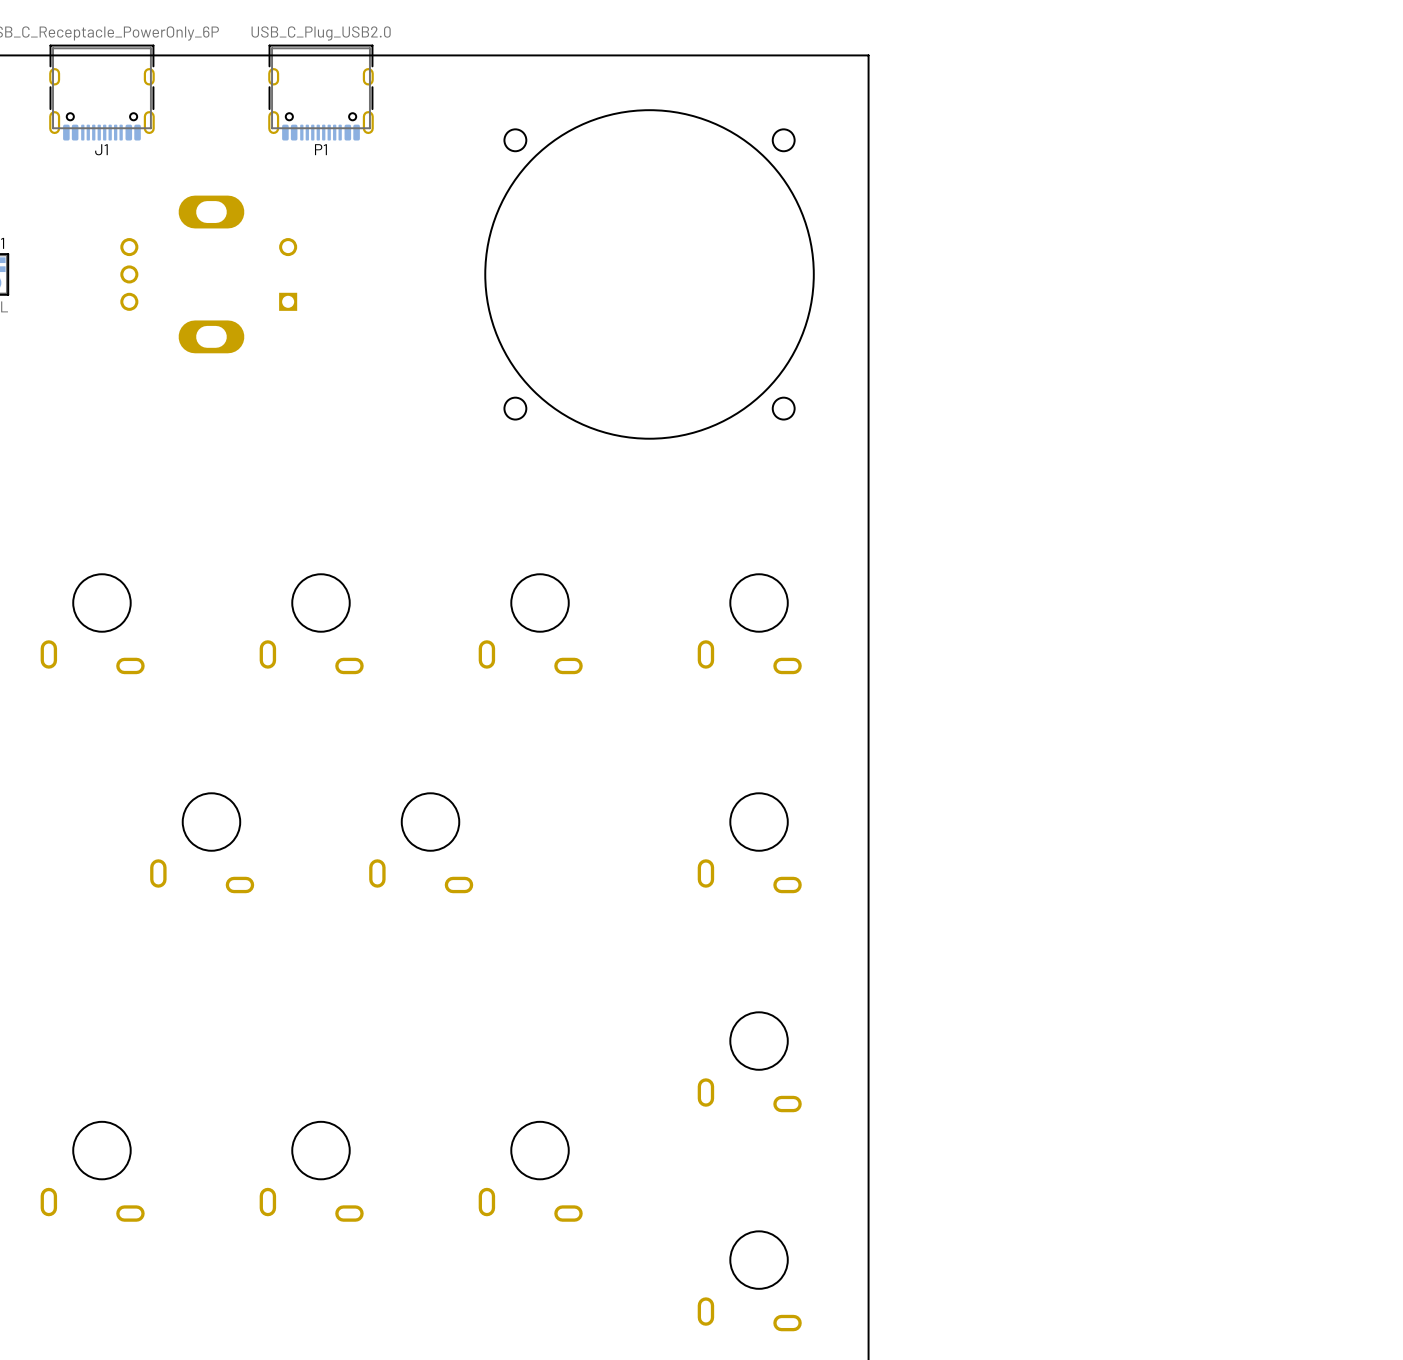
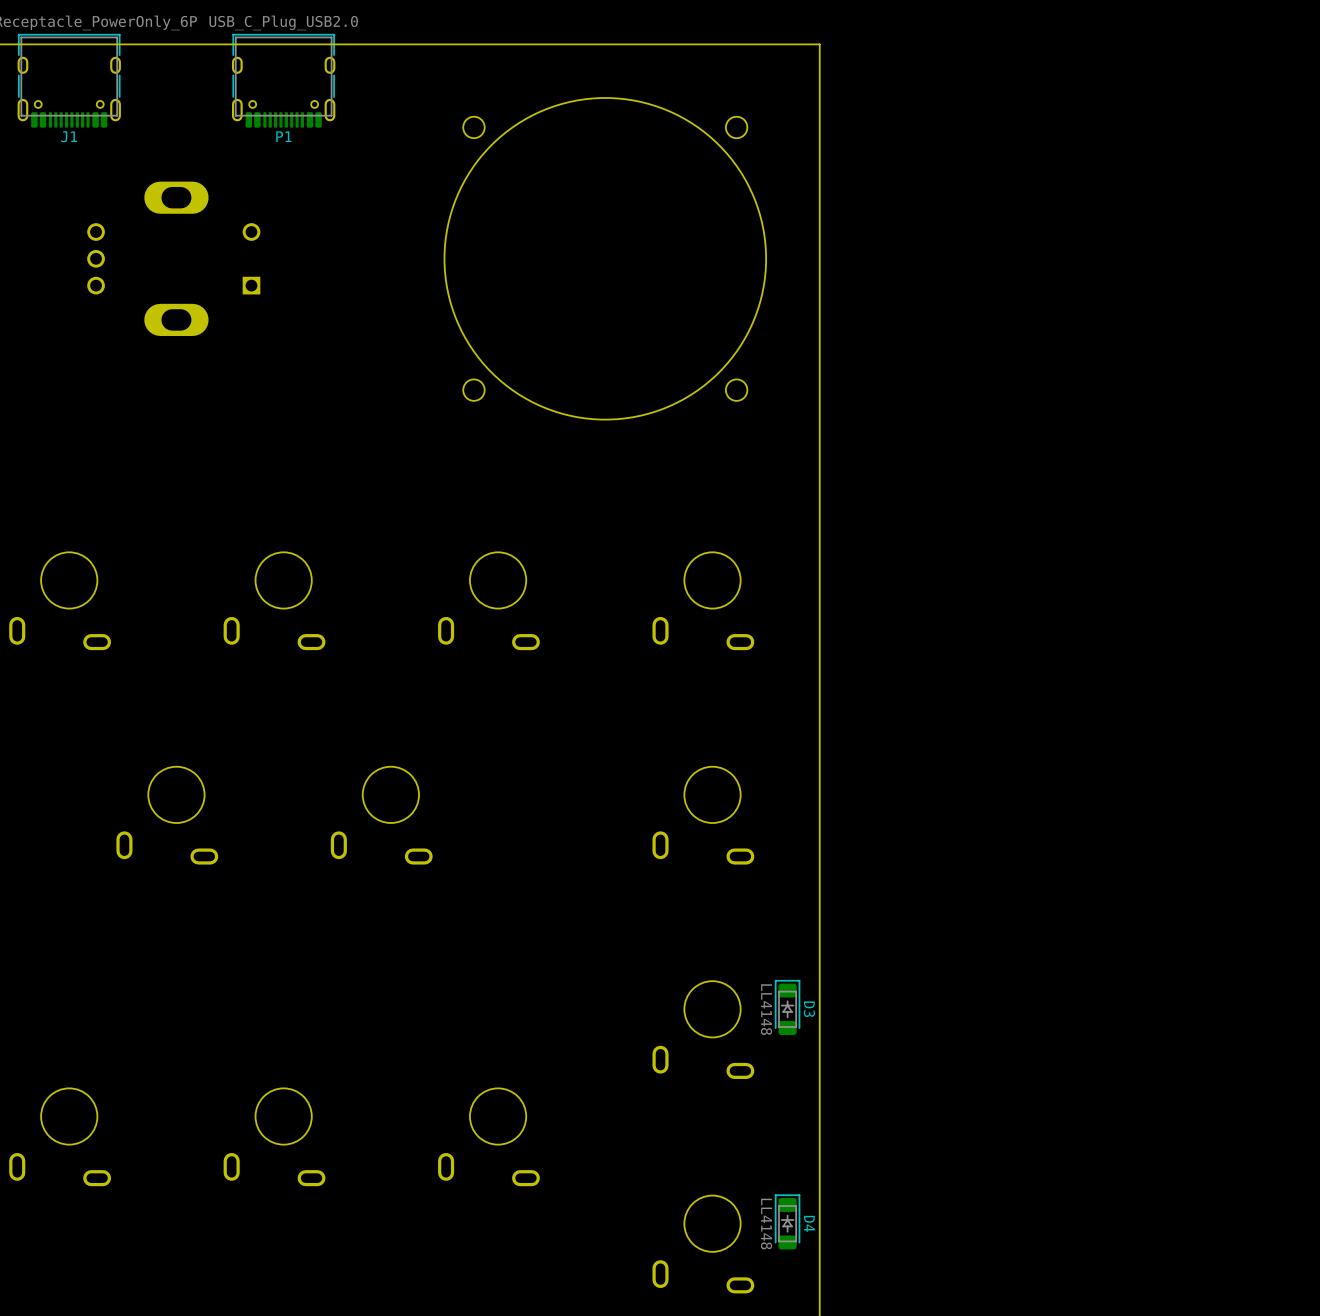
D3: none -> LL4148 (787, 1007)
D4: none -> LL4148 (787, 1222)

